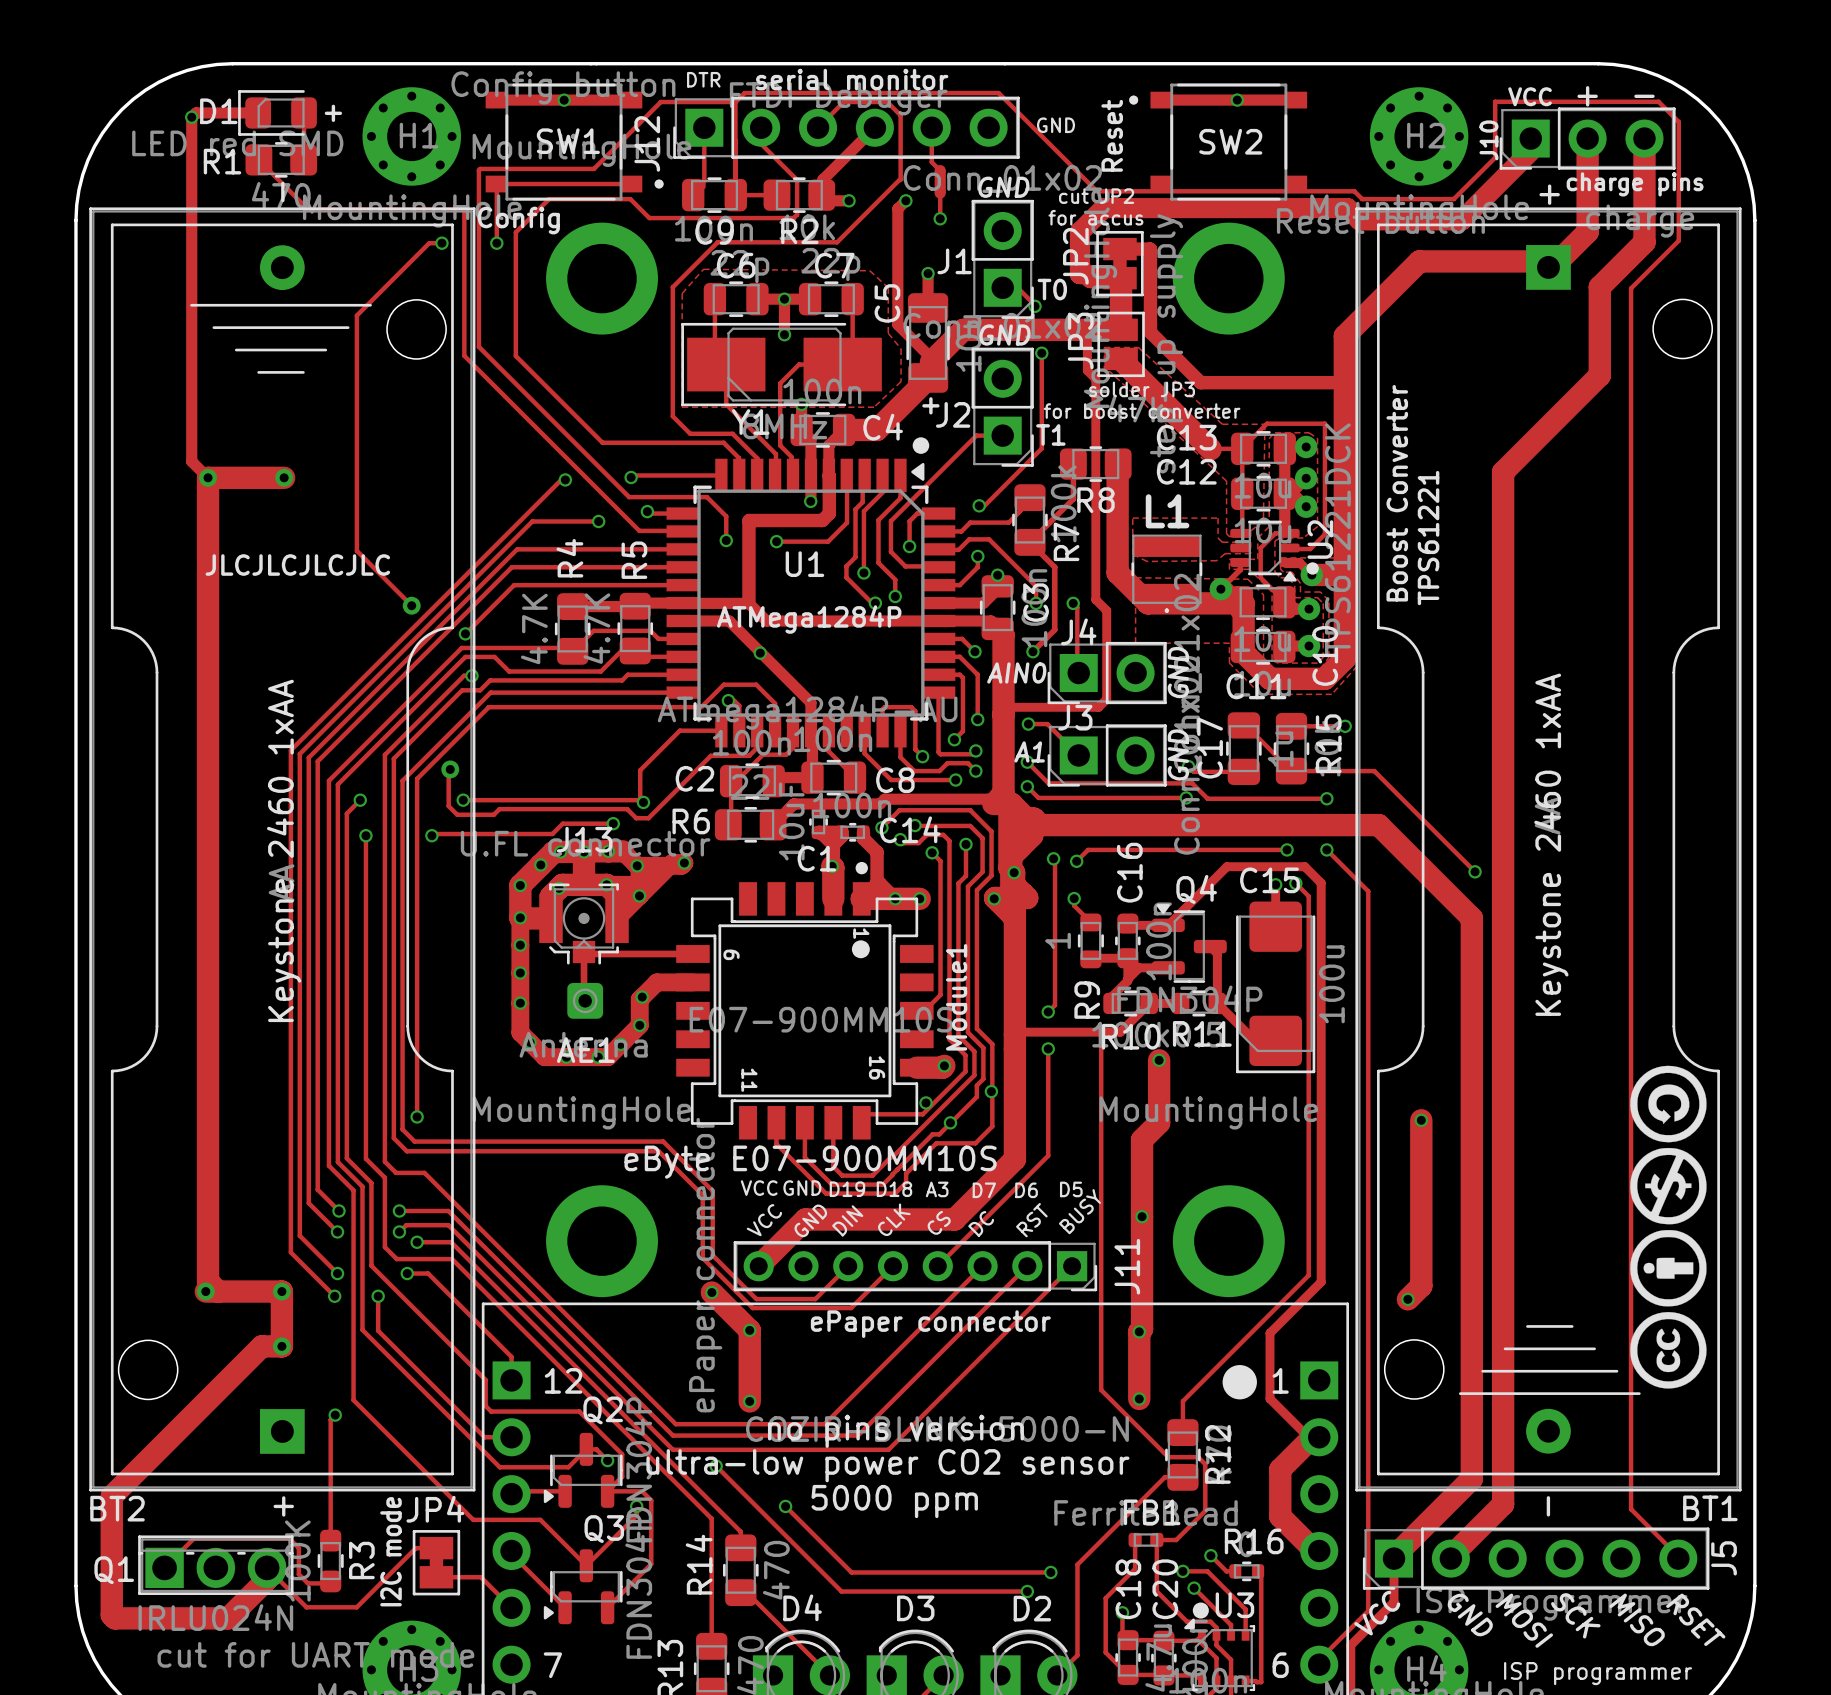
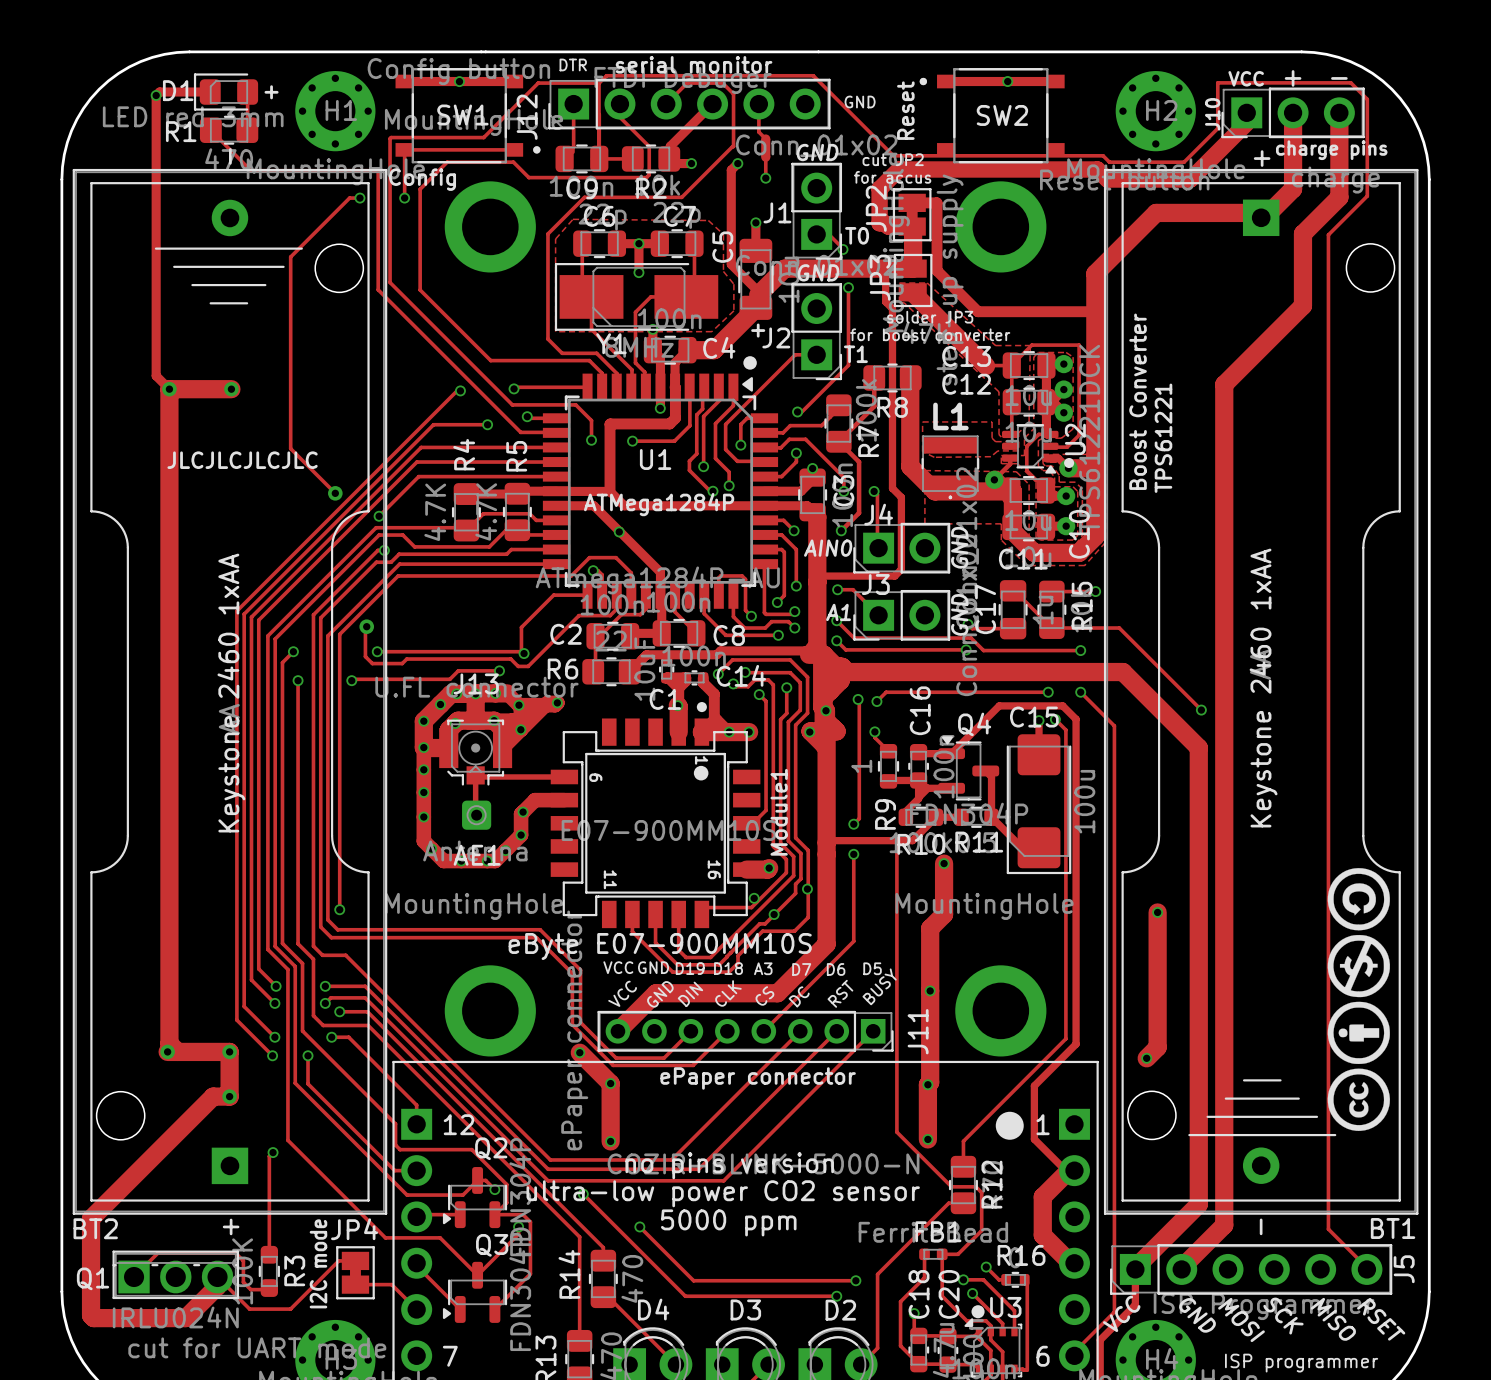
D1 value: LED red SMD (237, 143) -> LED red 3mm (193, 116)

